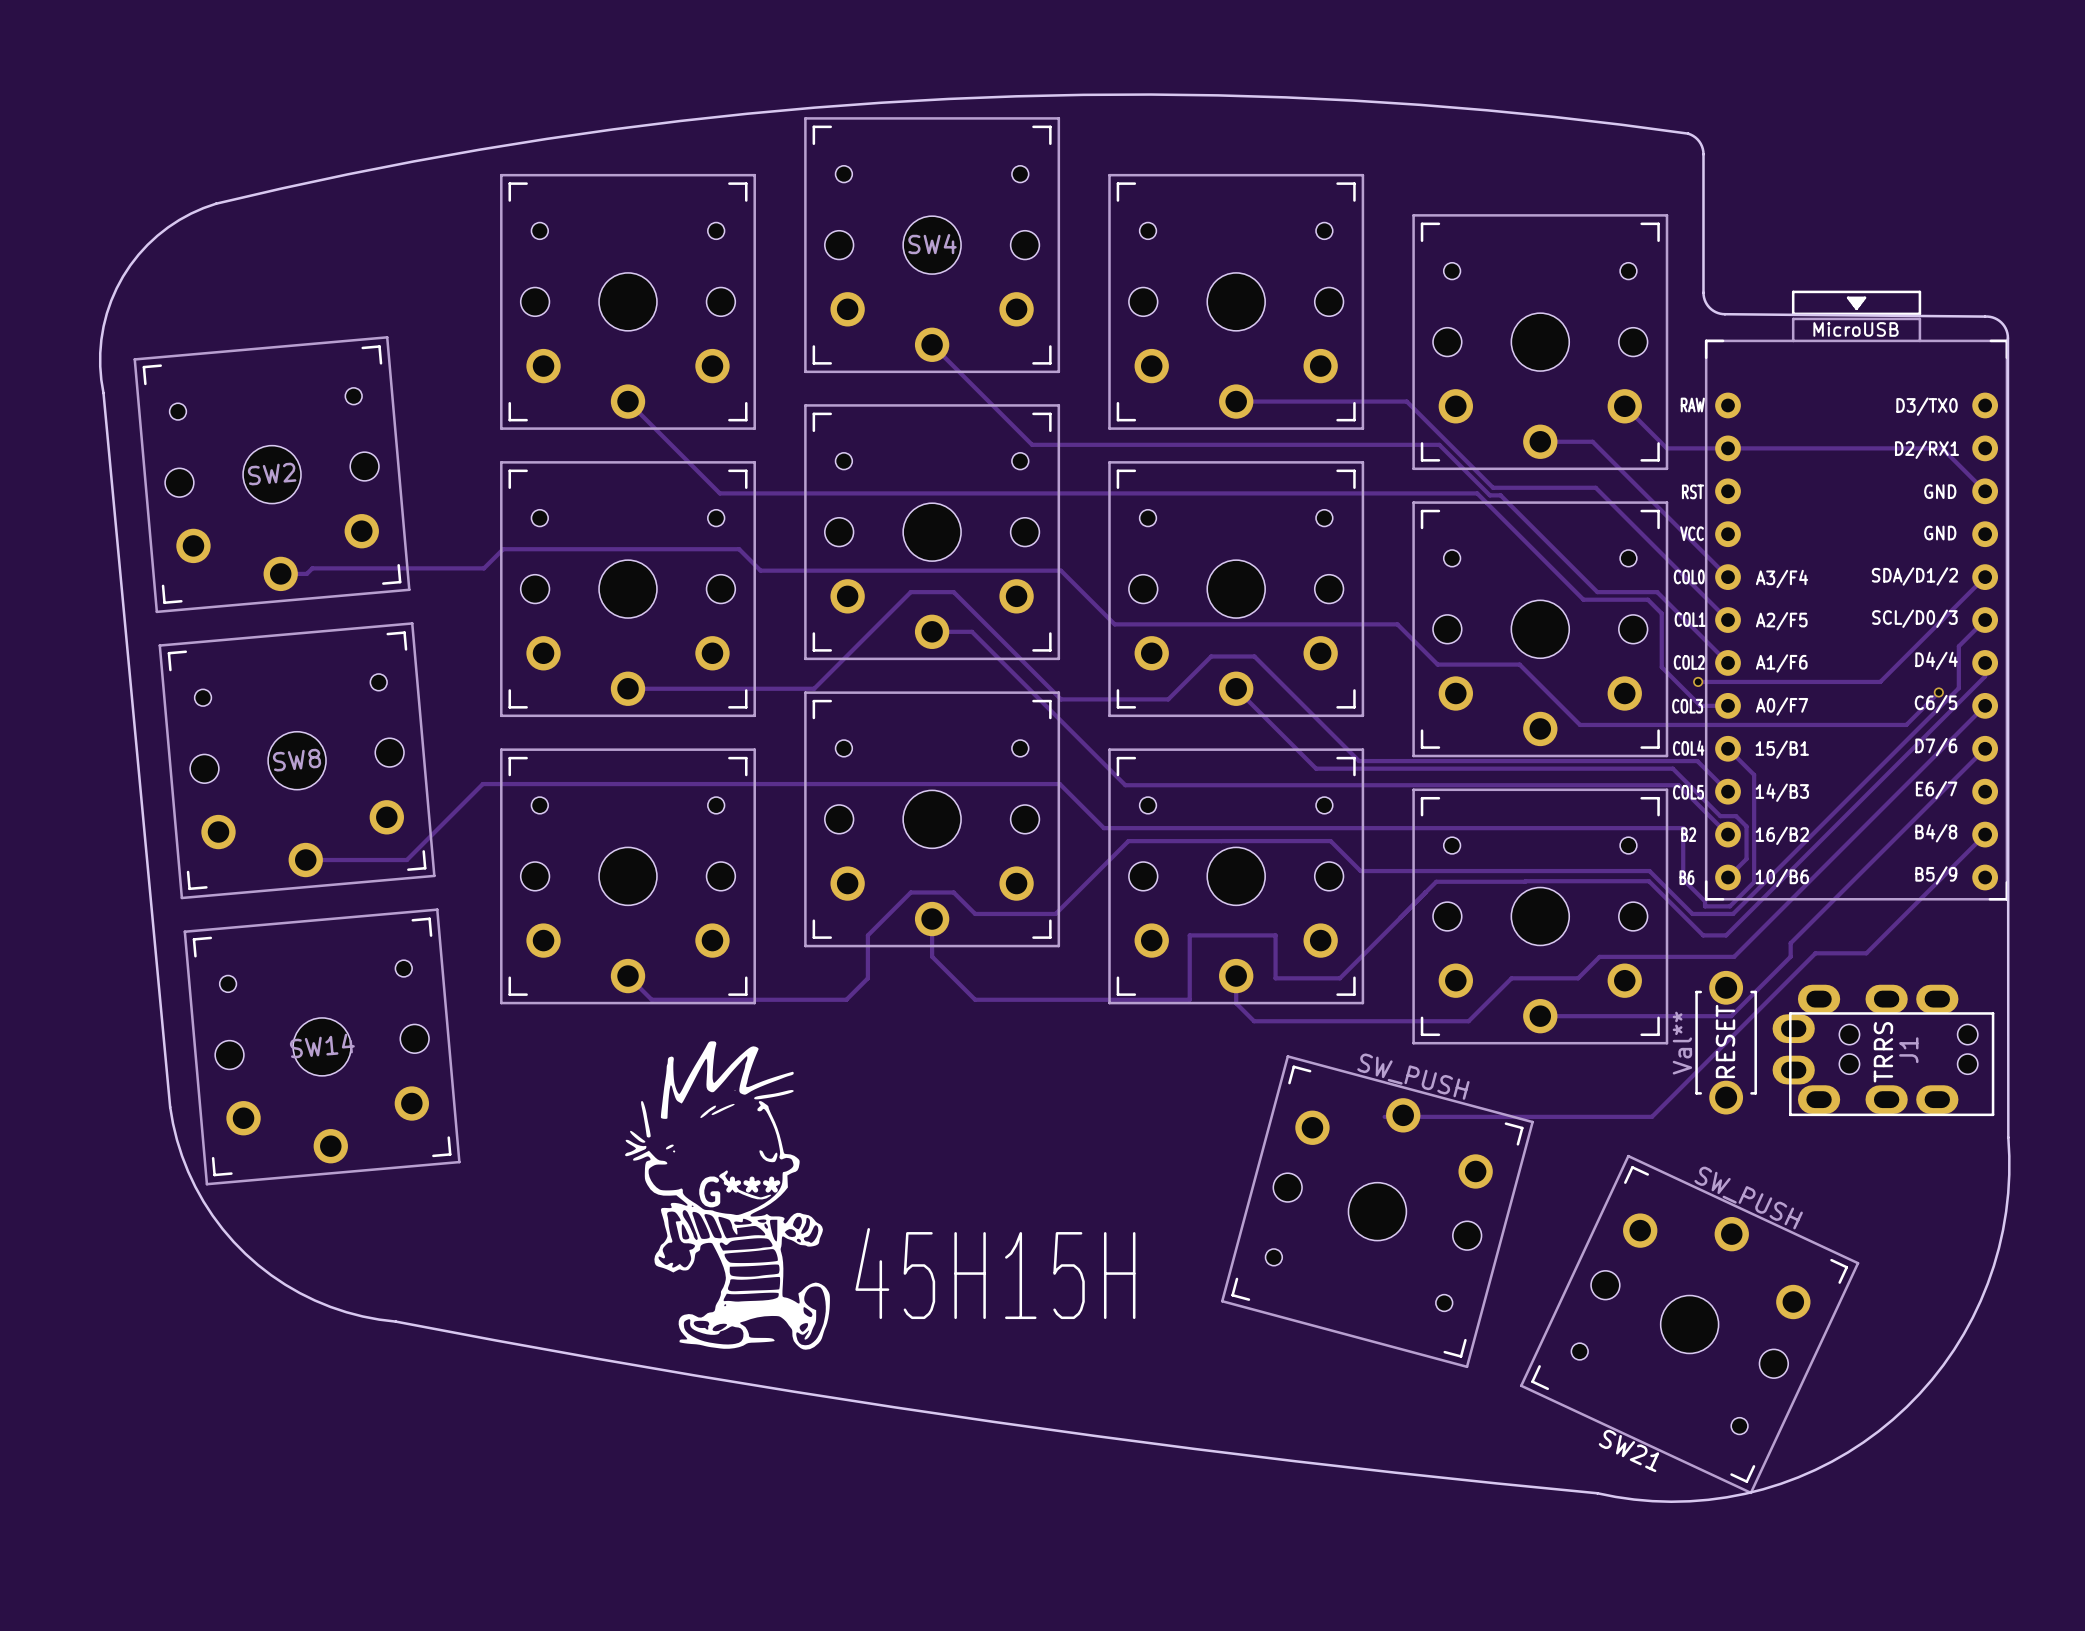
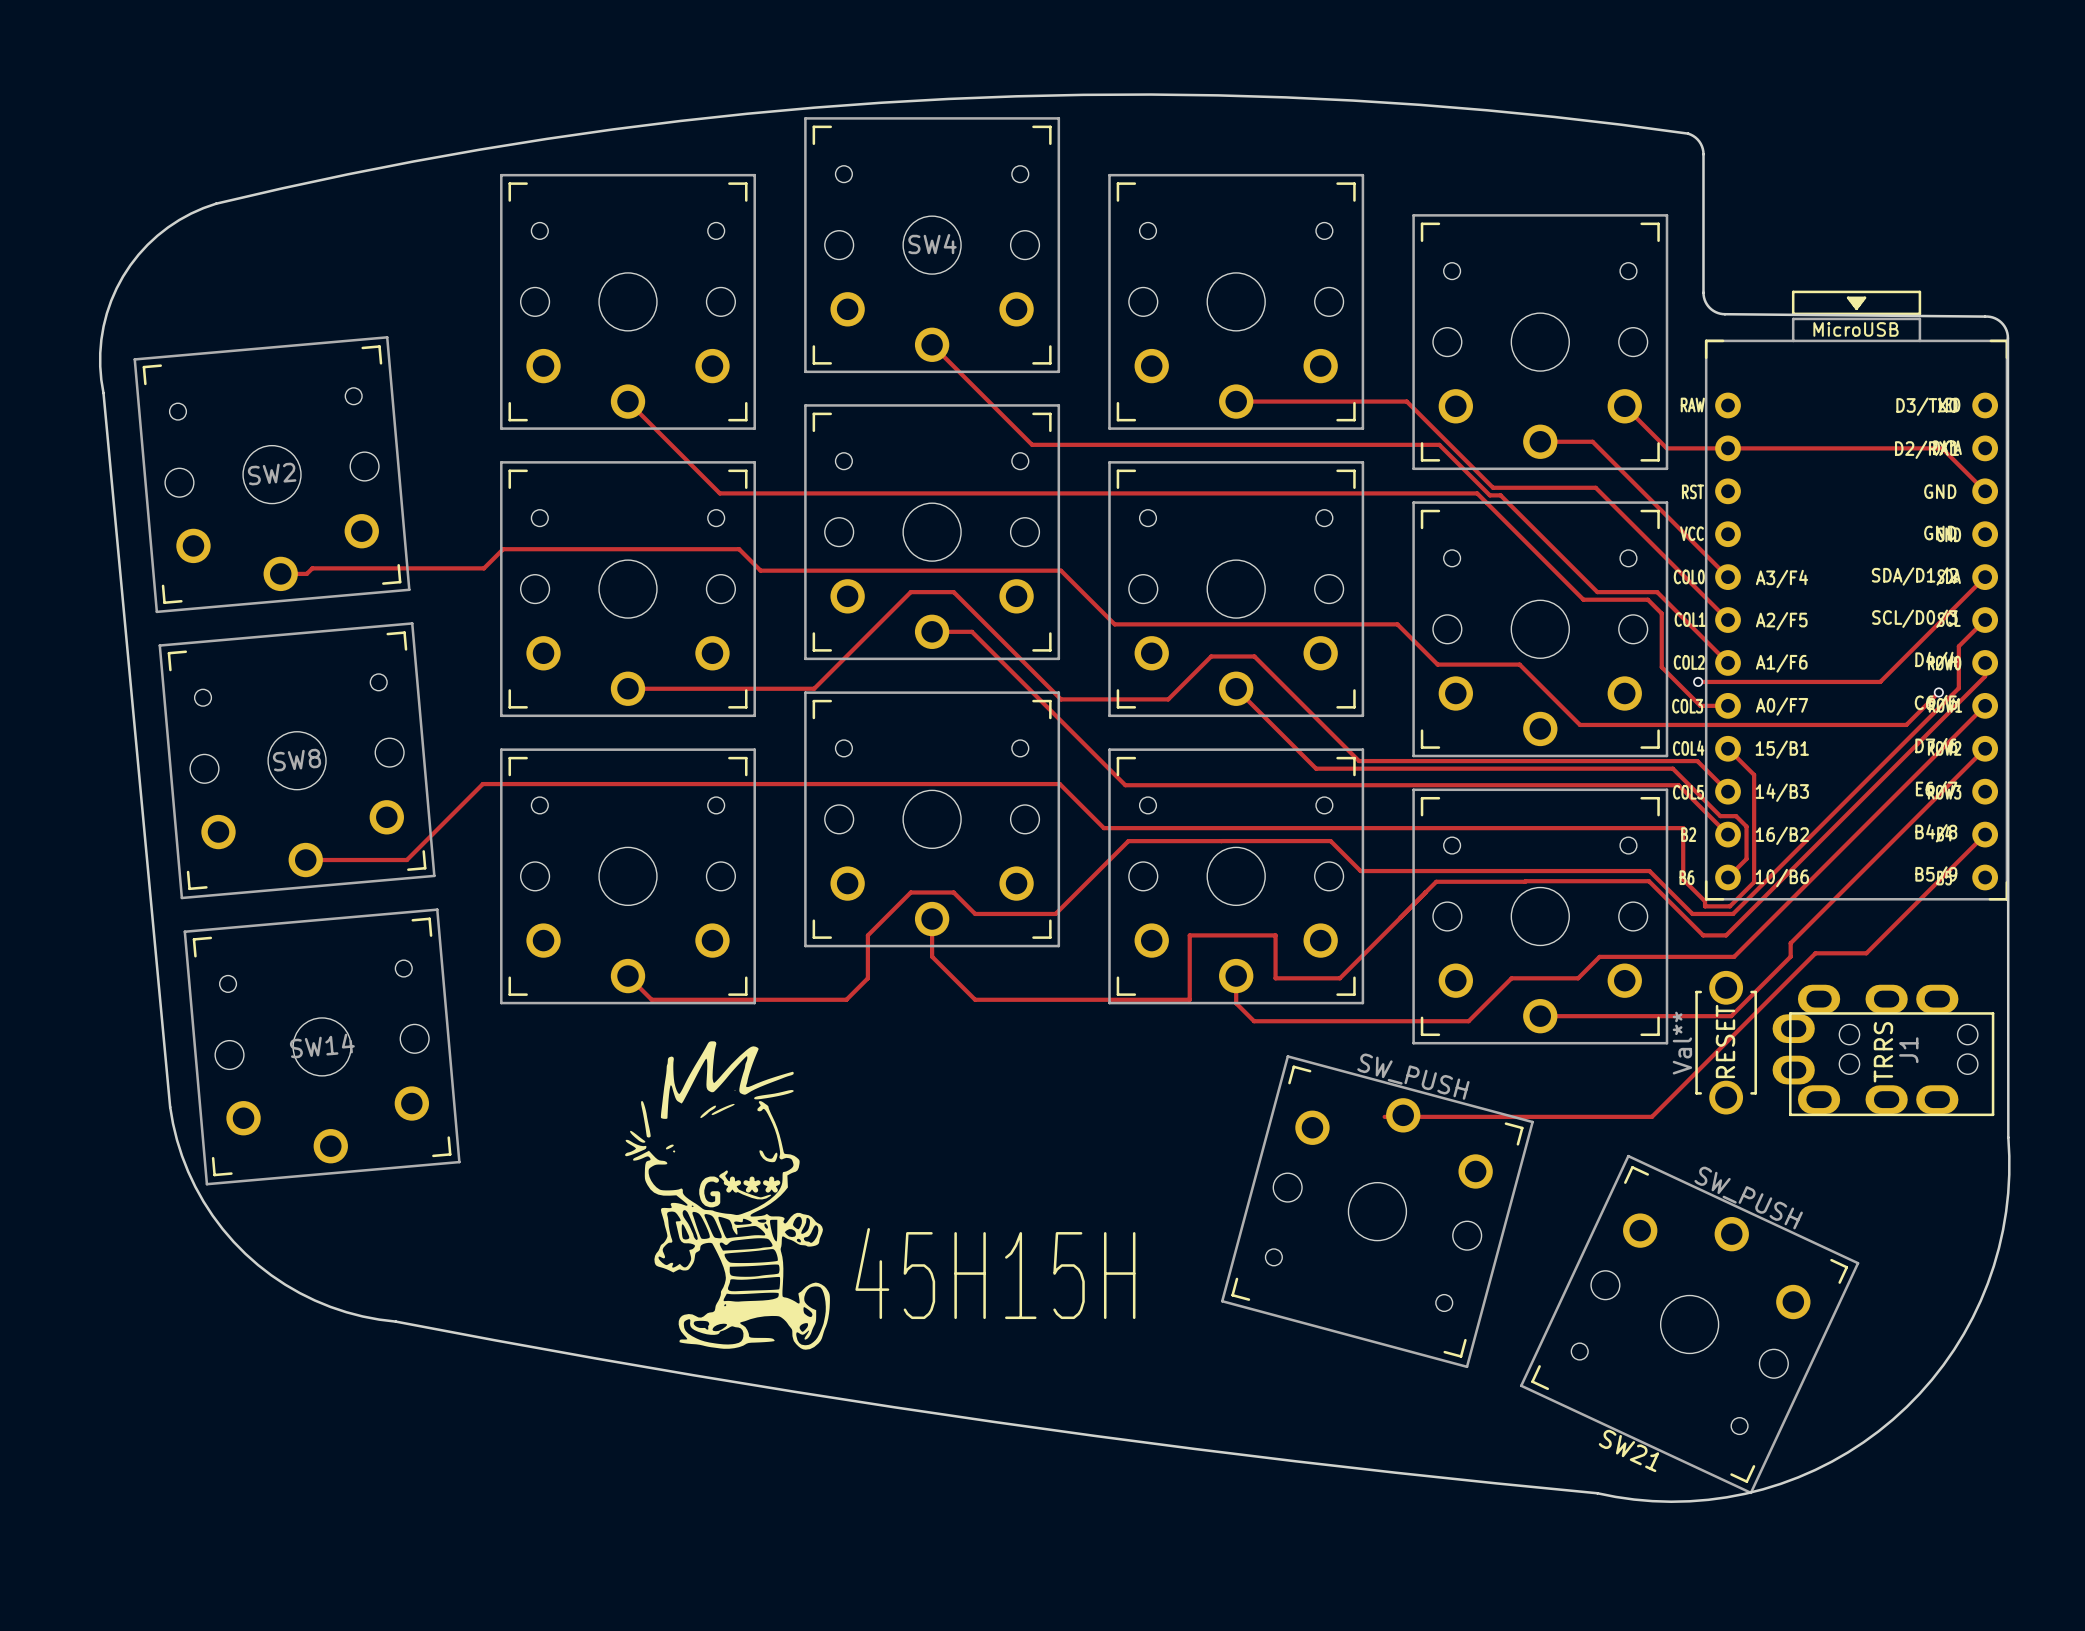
part footprint: [1704, 290, 2009, 901] -> [1704, 290, 2009, 901]

